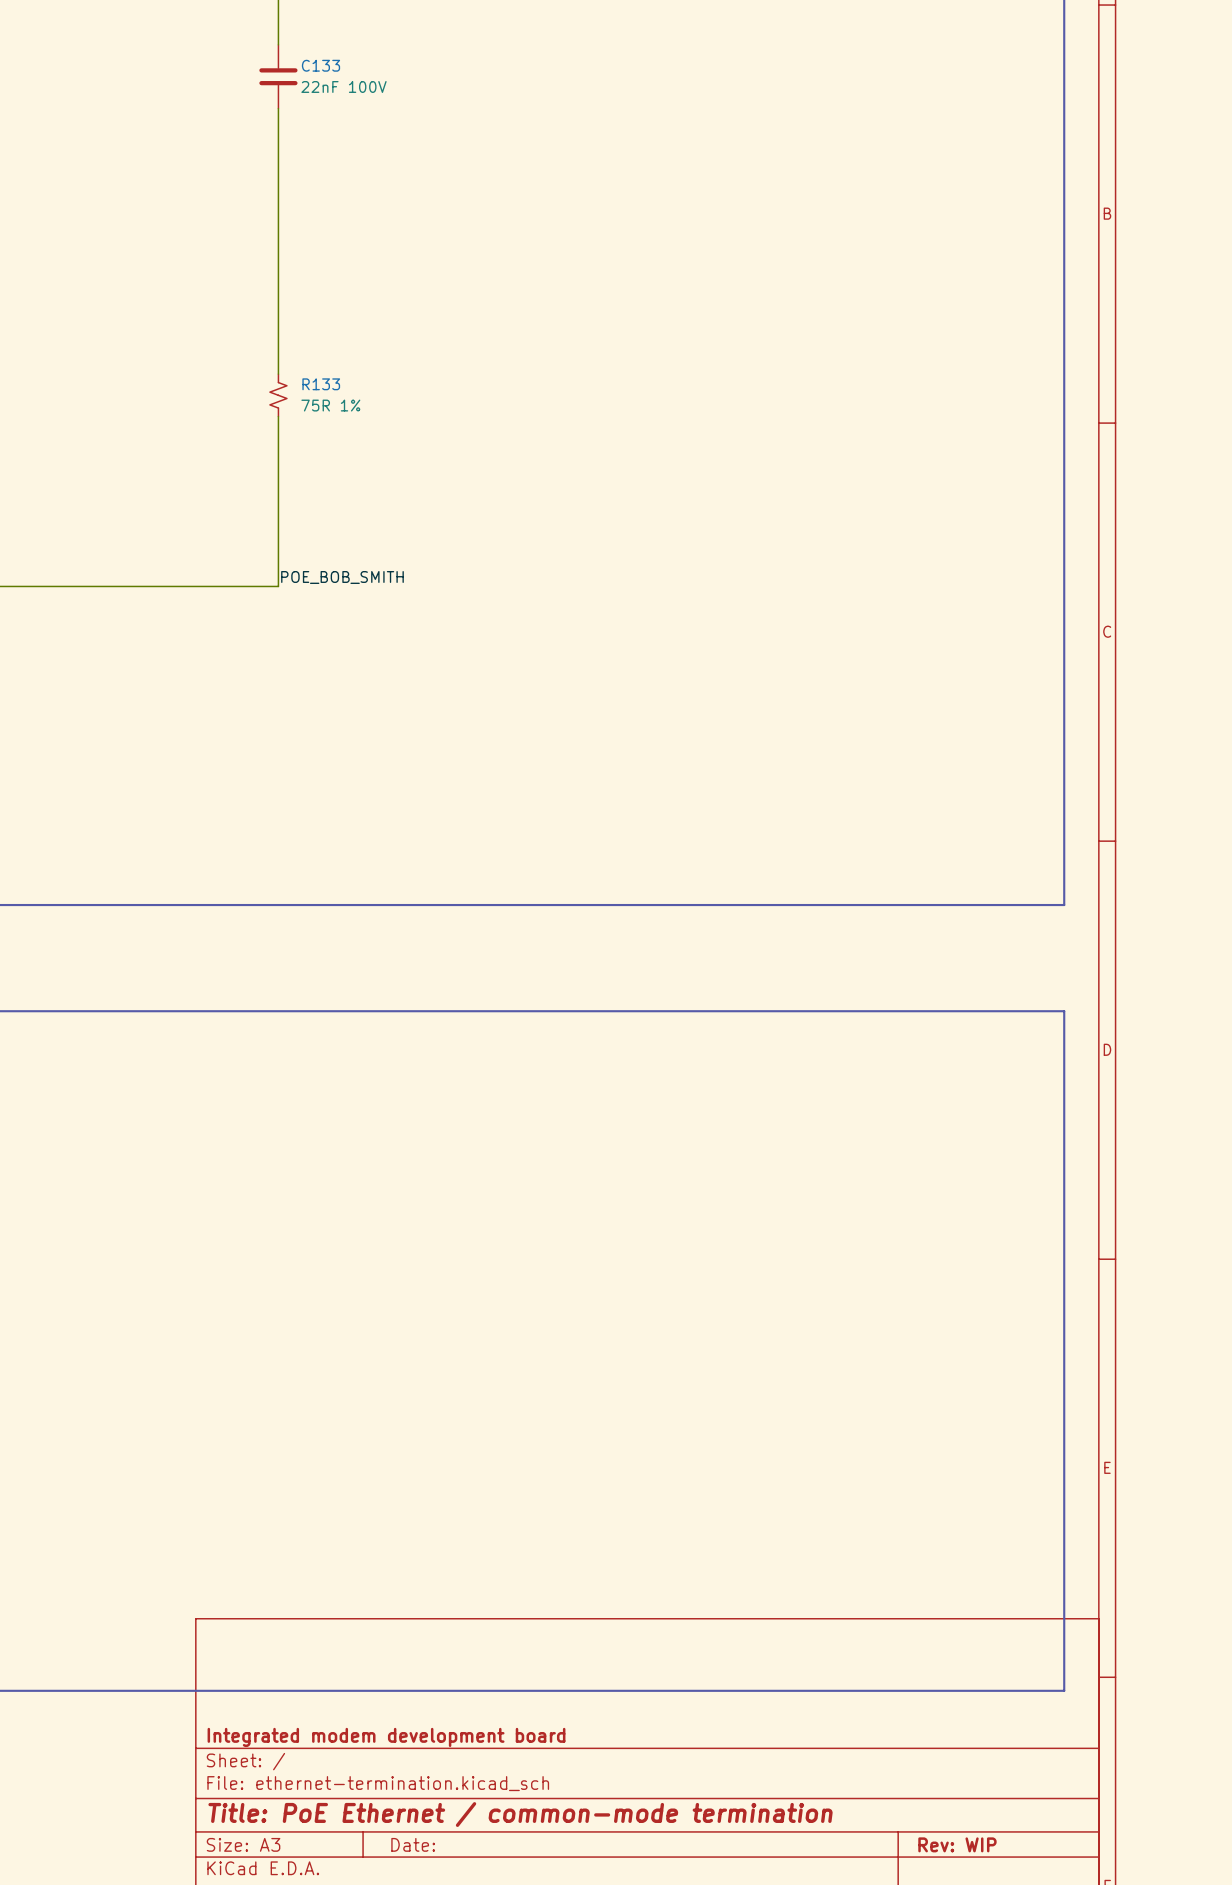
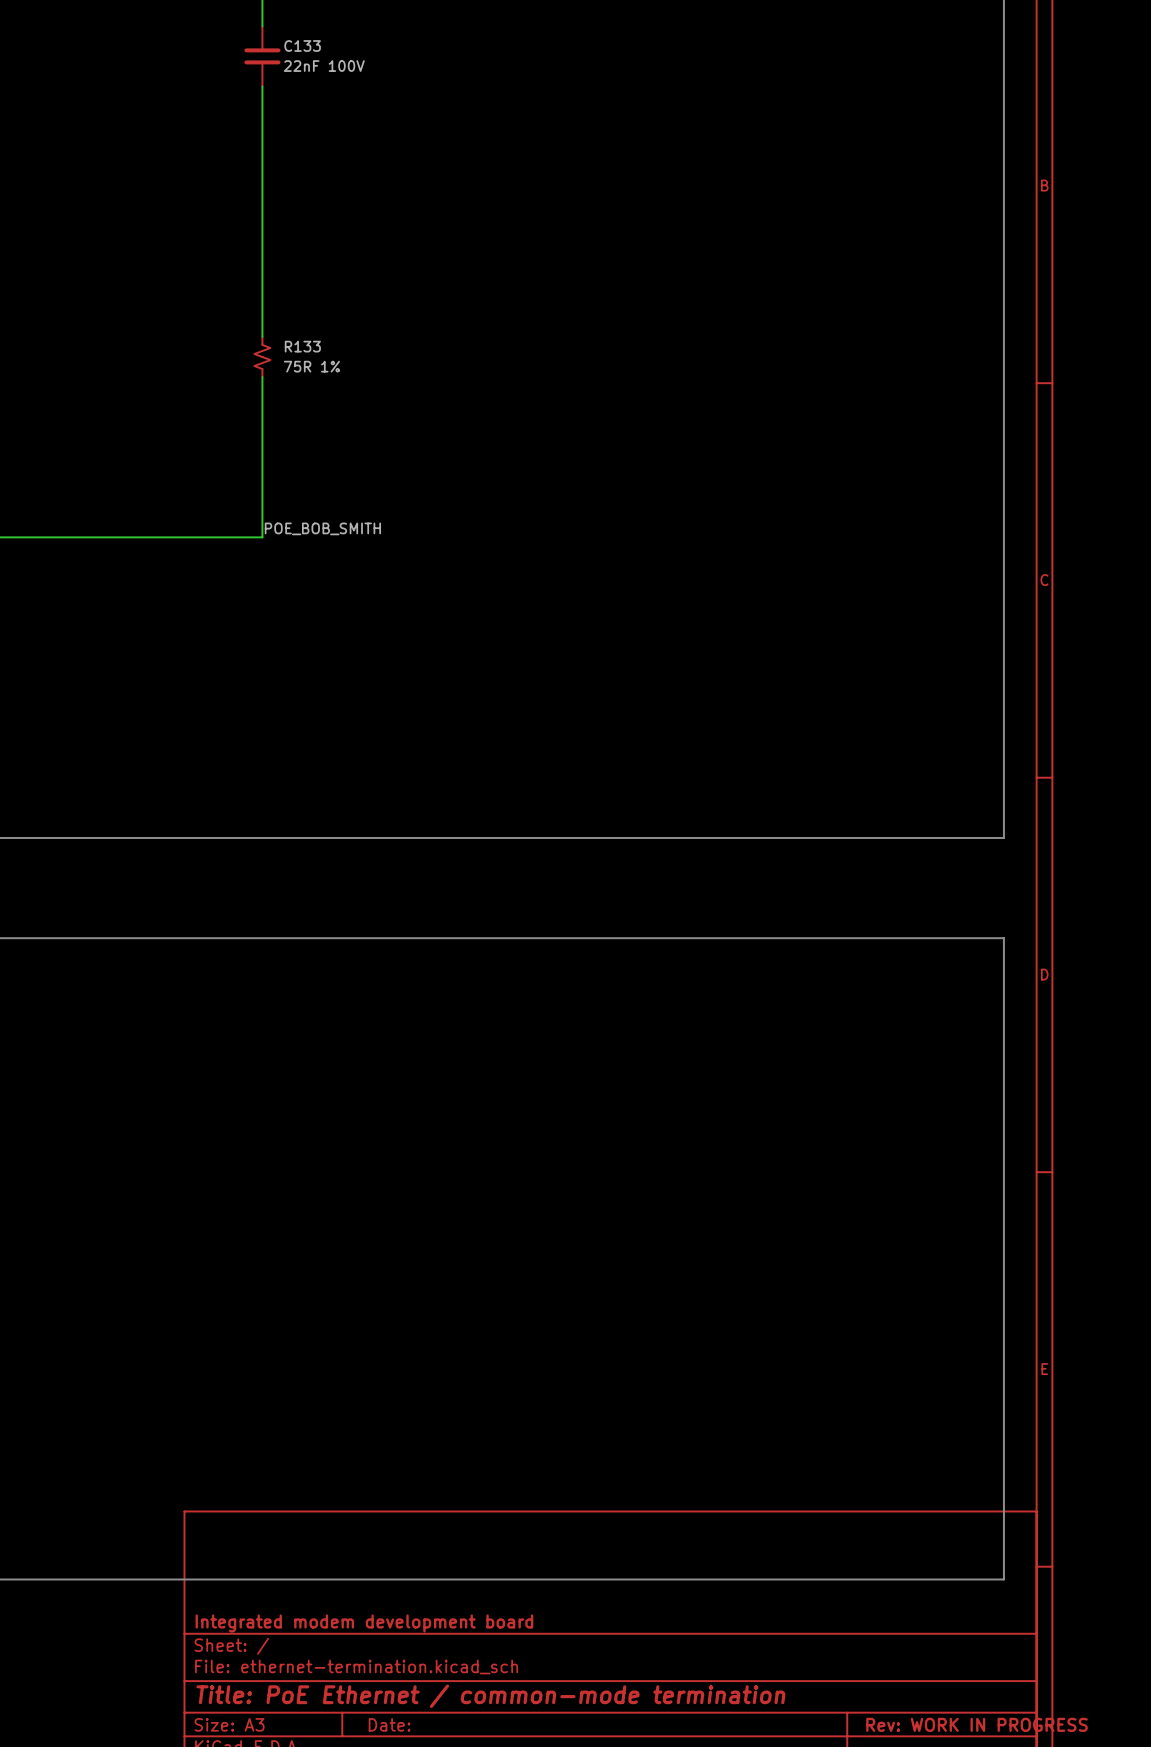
title block: Rev: WIP (957, 1844) -> Rev: WORK IN PROGRESS (977, 1724)

